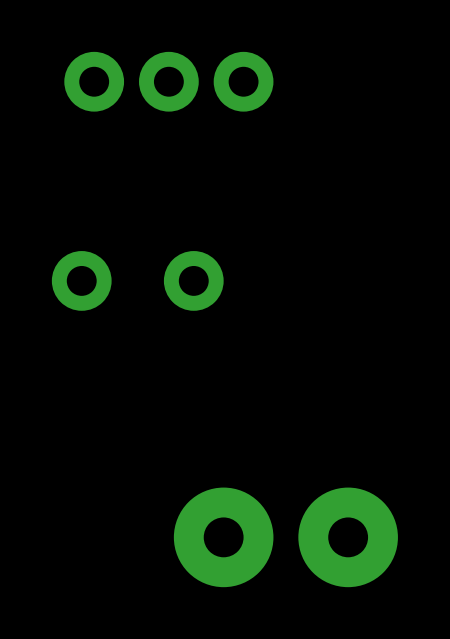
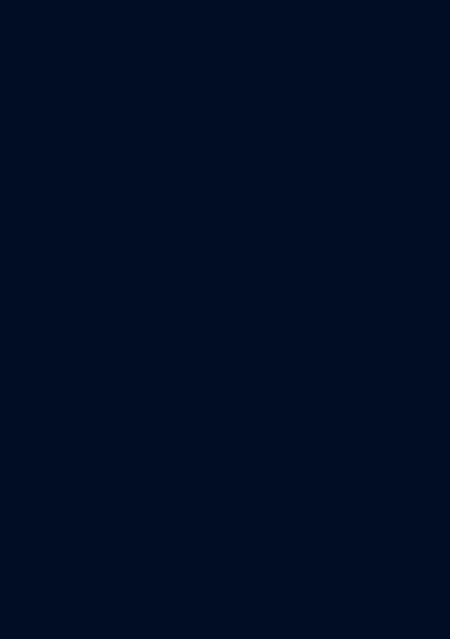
part: (168, 81) -> none
part: (137, 280) -> none
part: (285, 537) -> none

